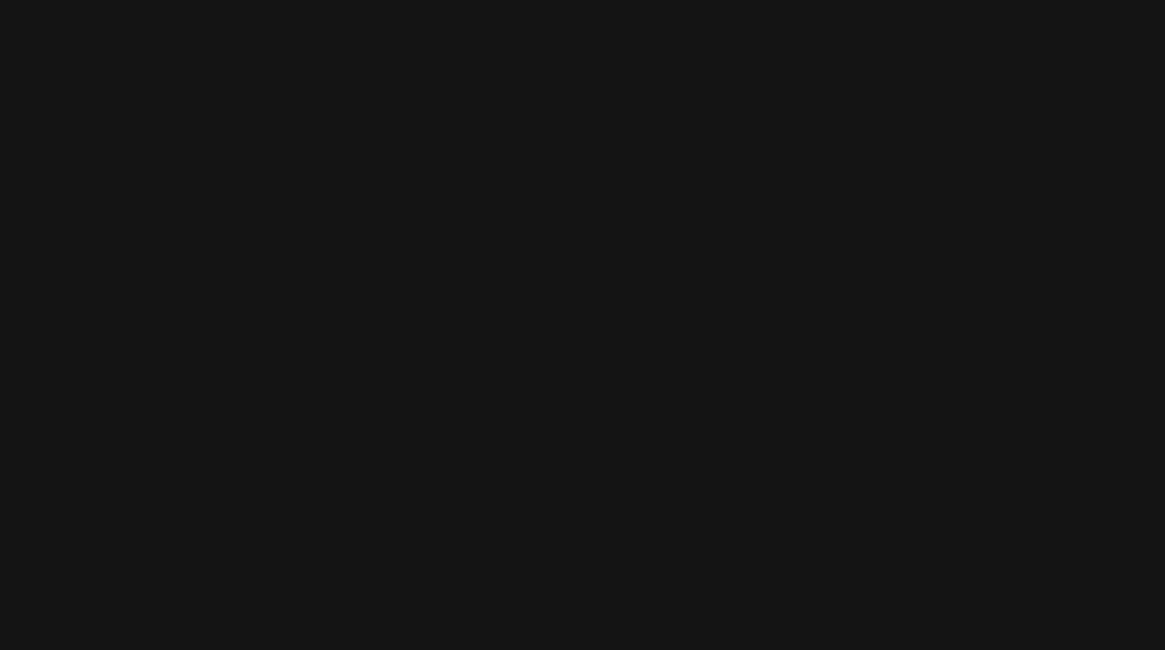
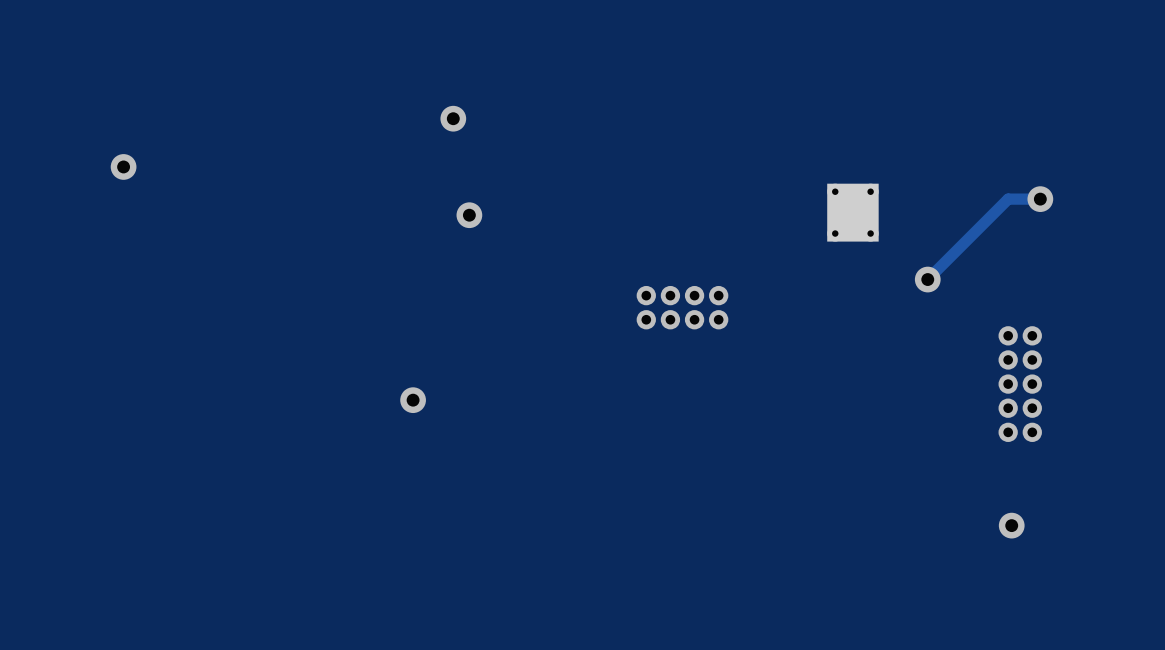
via: none -> (453, 118)
via: none -> (123, 166)
track: none -> (1040, 199) (1008, 199) (927, 279)
via: none -> (1040, 199)
part: none -> (852, 212)
via: none -> (469, 215)
via: none -> (927, 279)
via: none -> (646, 295)
via: none -> (670, 295)
via: none -> (694, 295)
via: none -> (718, 295)
via: none -> (646, 319)
via: none -> (670, 319)
via: none -> (694, 319)
via: none -> (718, 319)
via: none -> (1008, 335)
via: none -> (1032, 335)
via: none -> (1008, 359)
via: none -> (1032, 359)
via: none -> (1008, 384)
via: none -> (1032, 384)
via: none -> (413, 400)
via: none -> (1008, 408)
via: none -> (1032, 408)
via: none -> (1008, 432)
via: none -> (1032, 432)
via: none -> (1011, 525)

